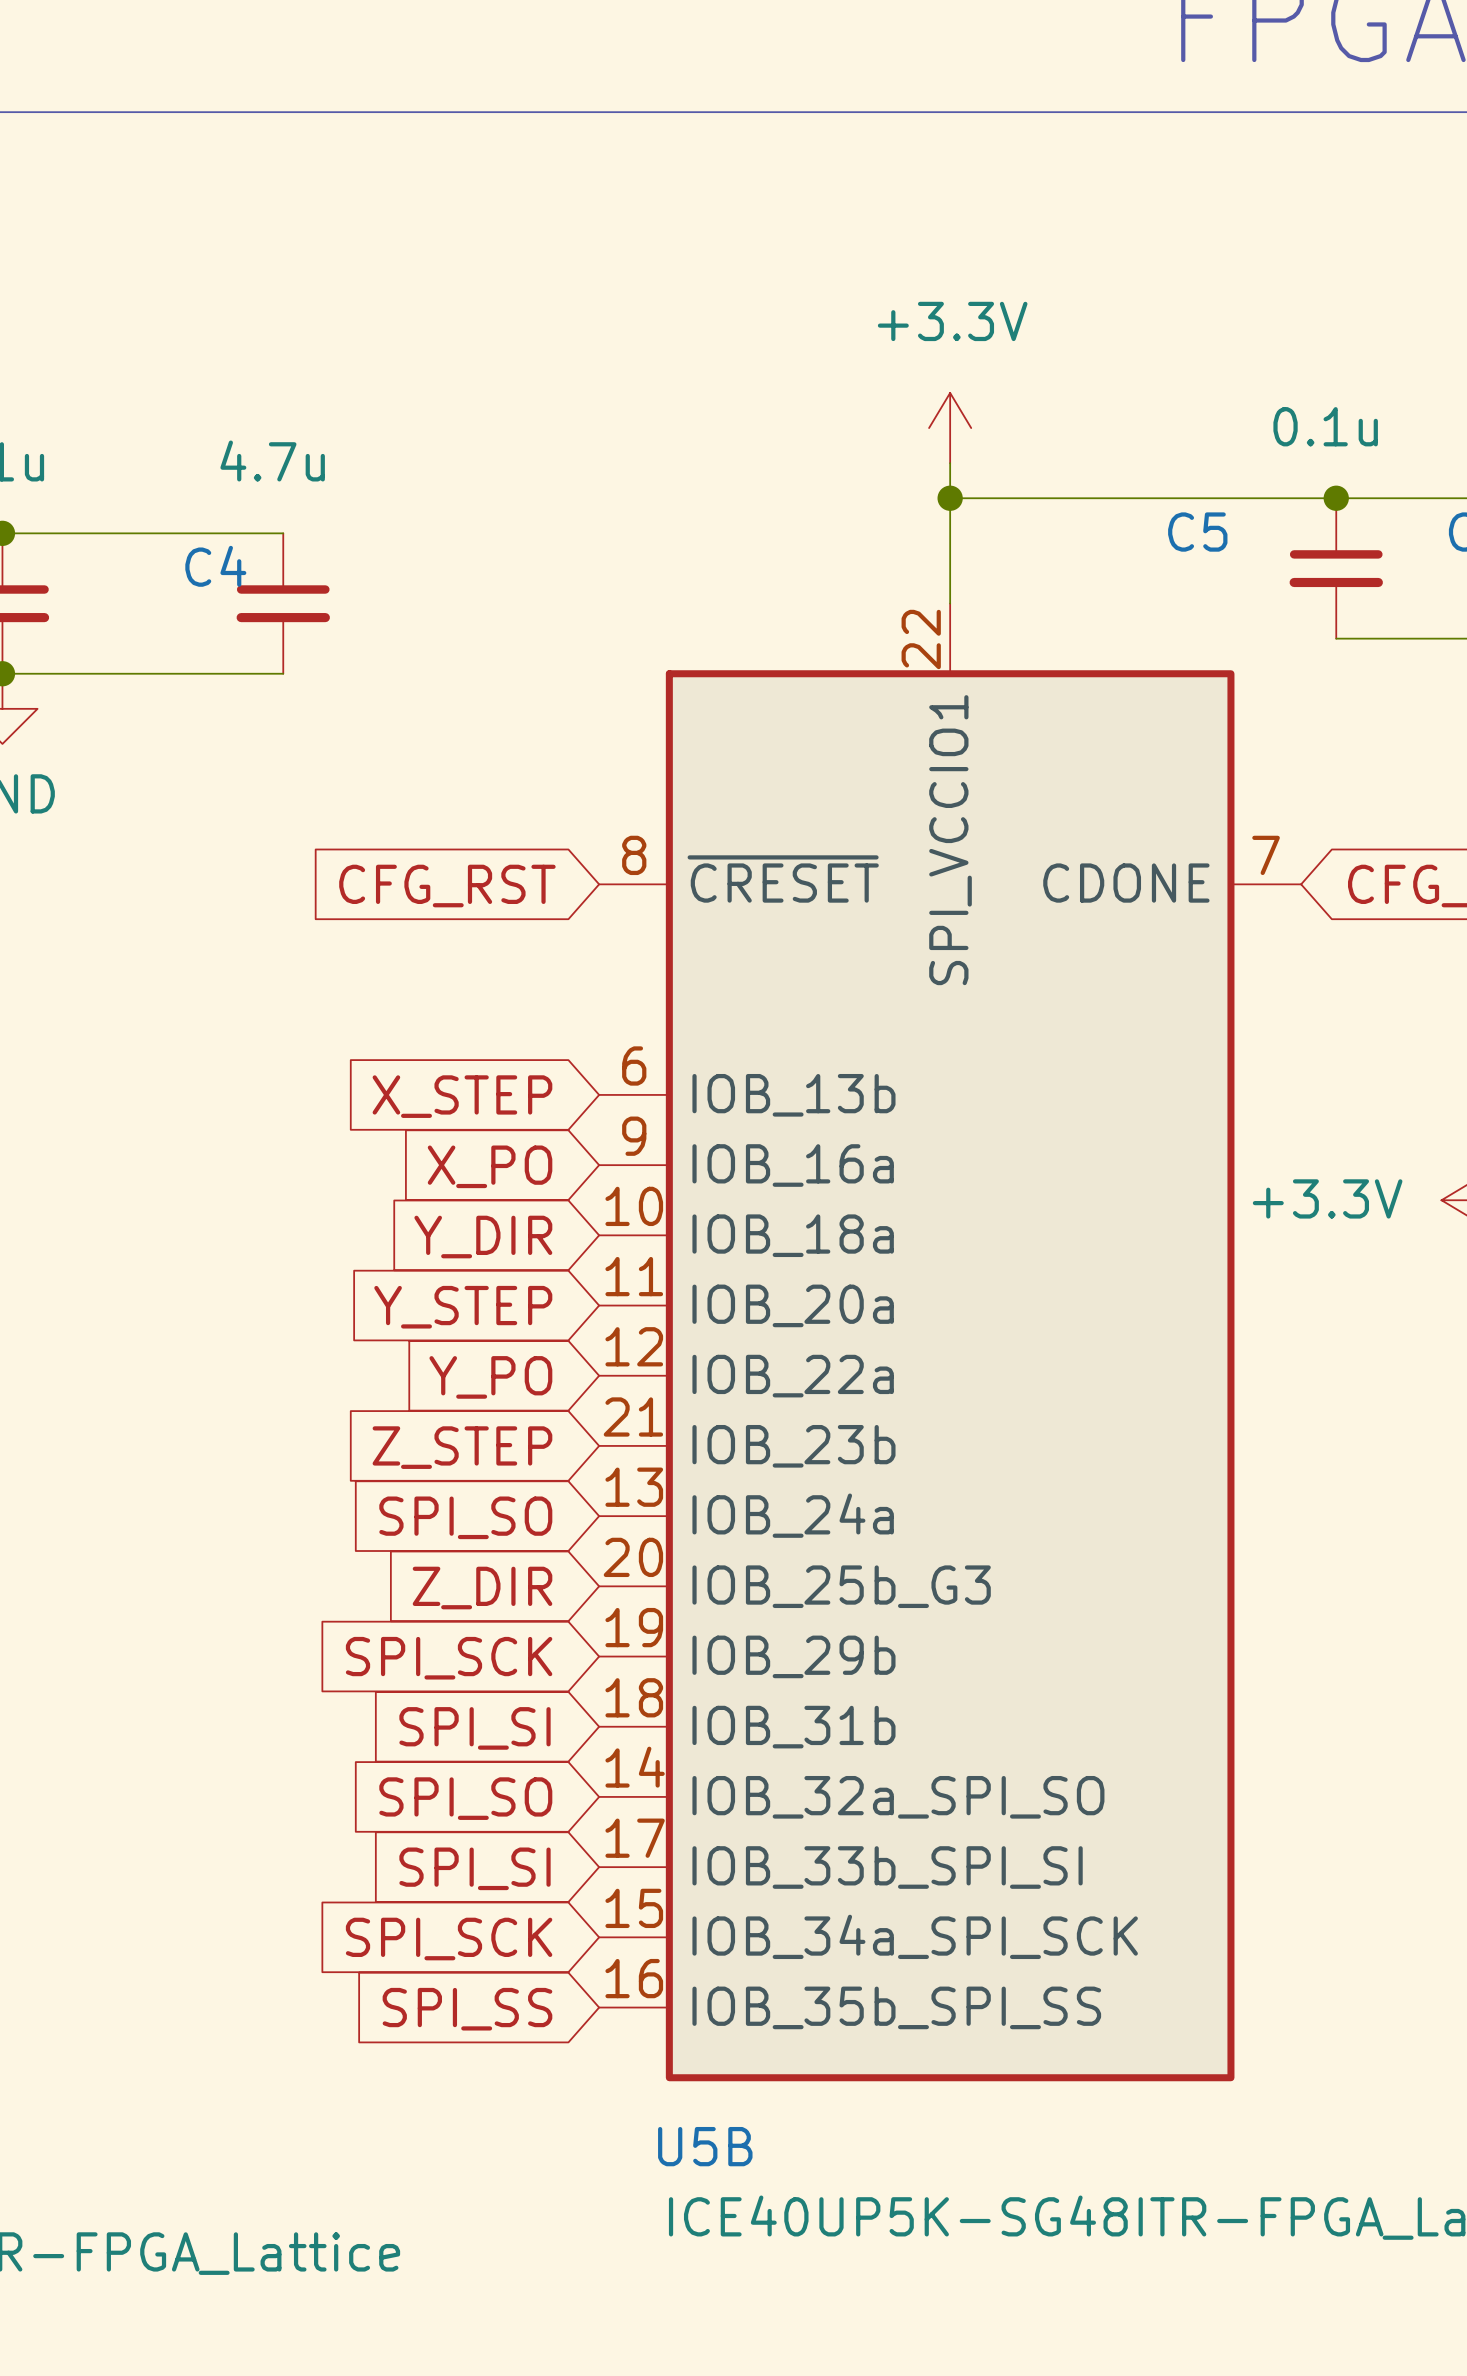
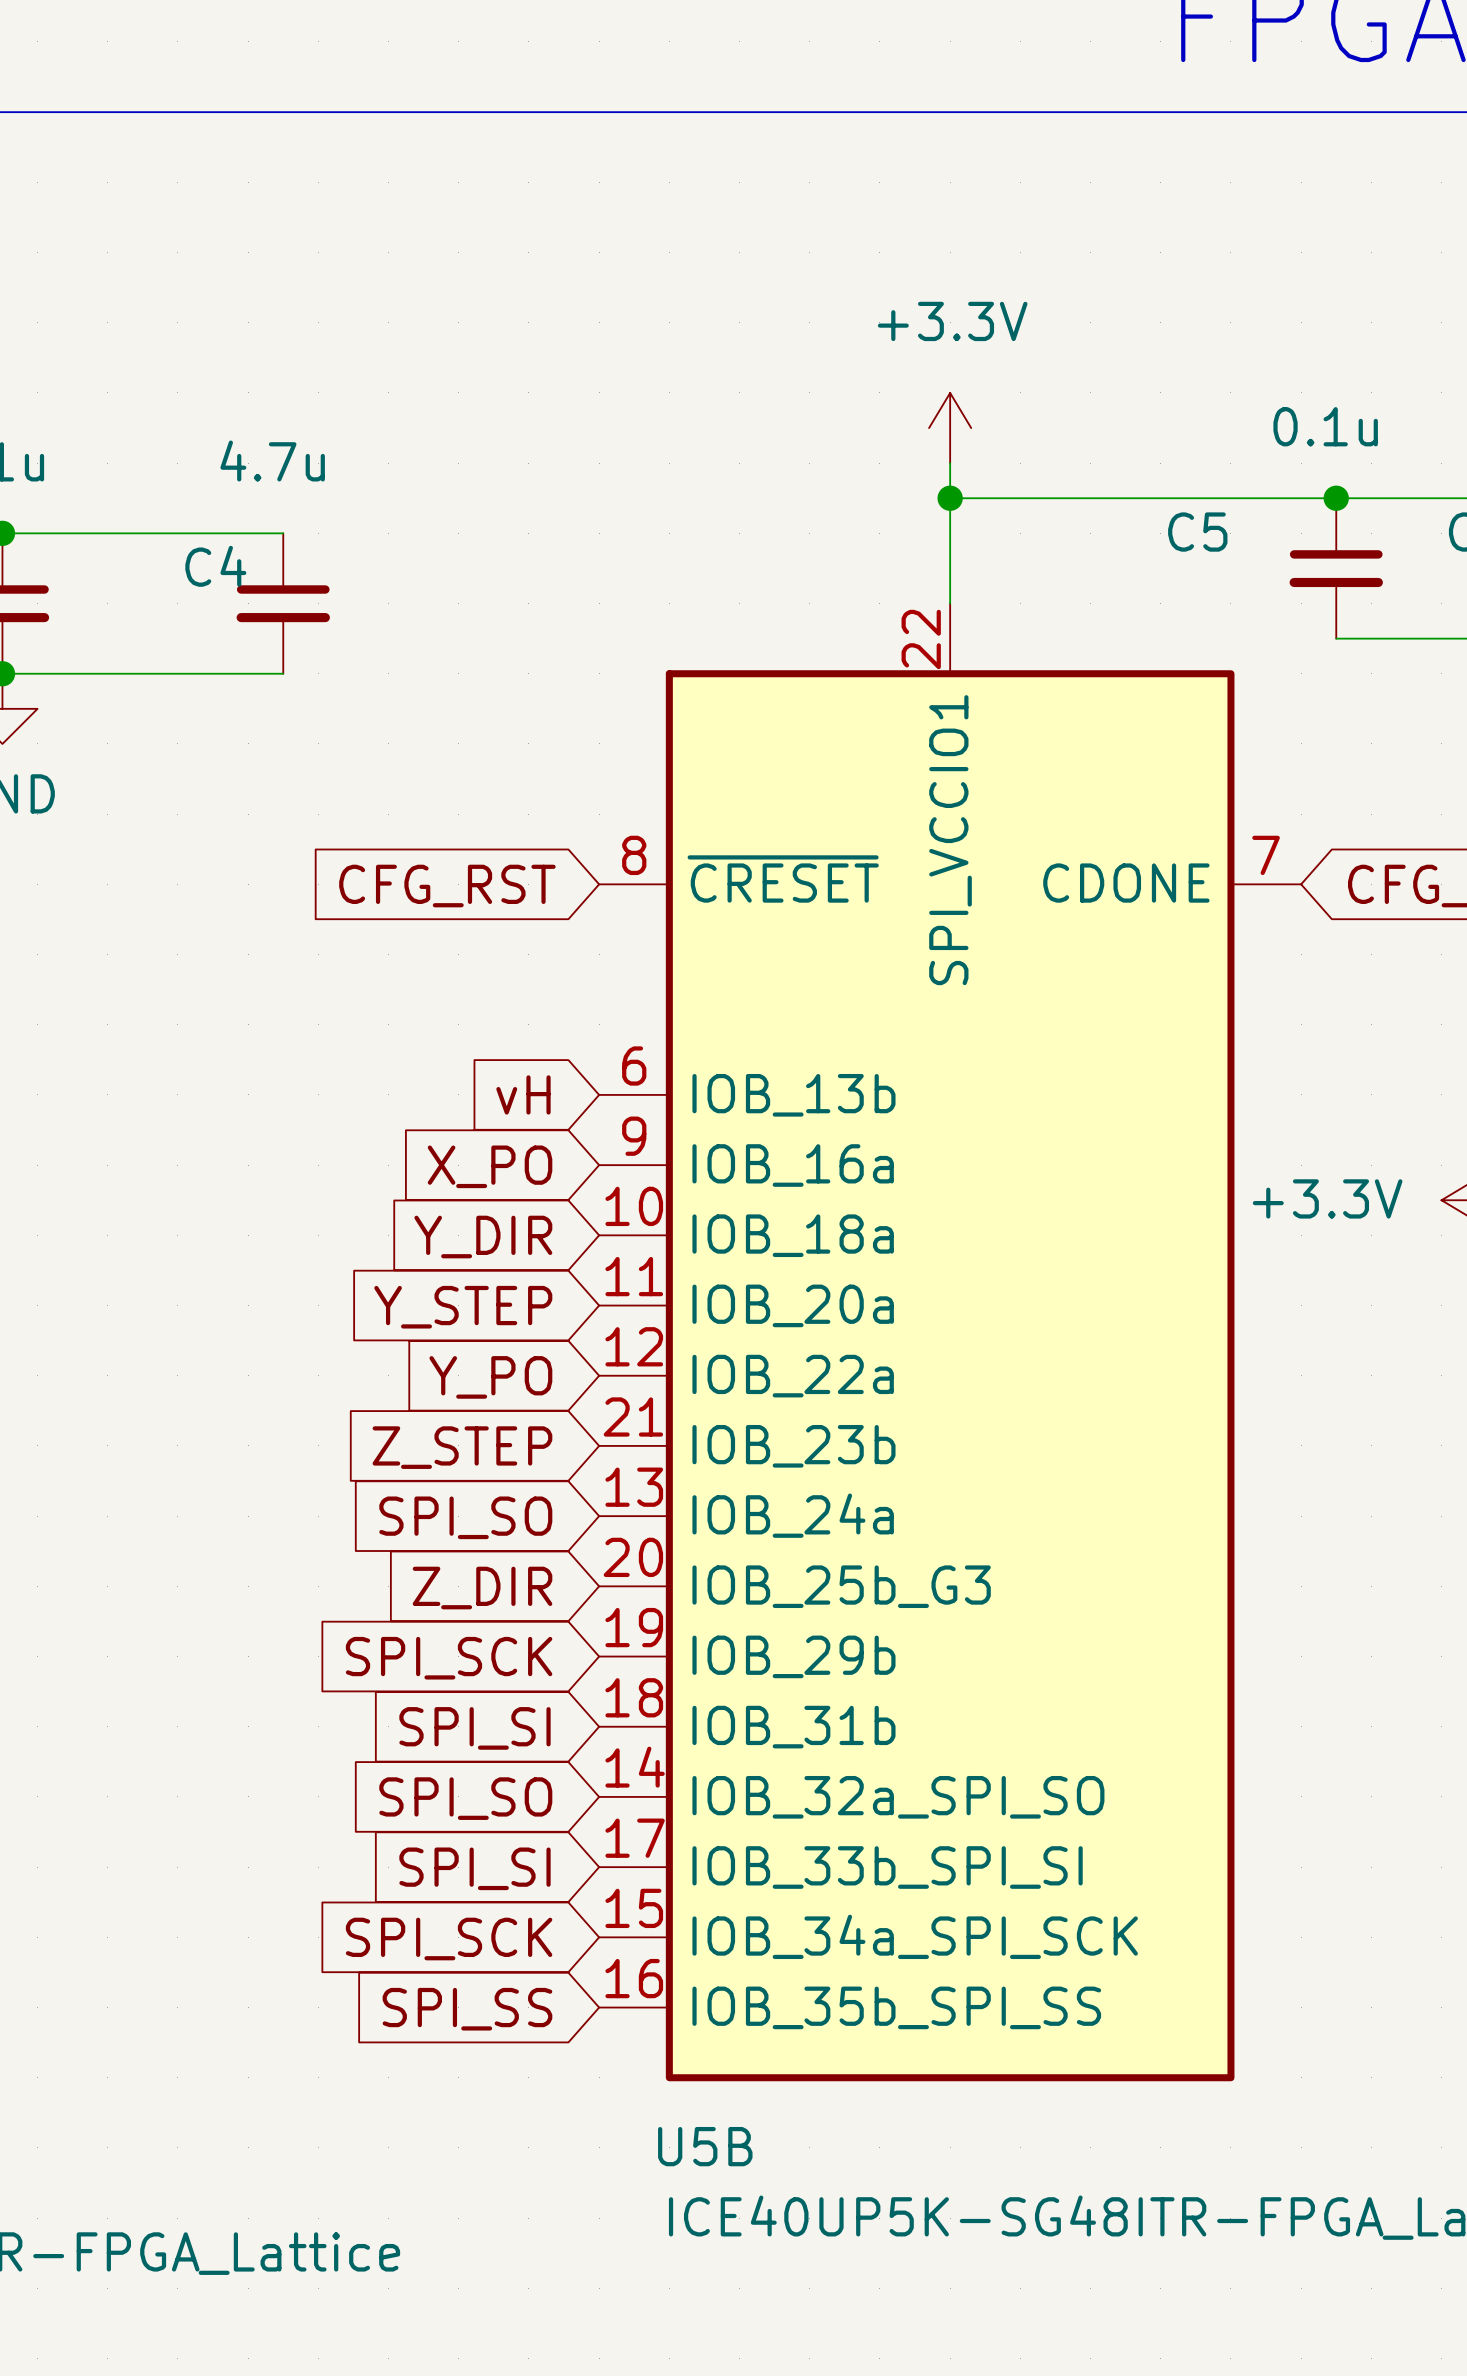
global label: X_STEP (462, 1096) -> vH (523, 1094)

